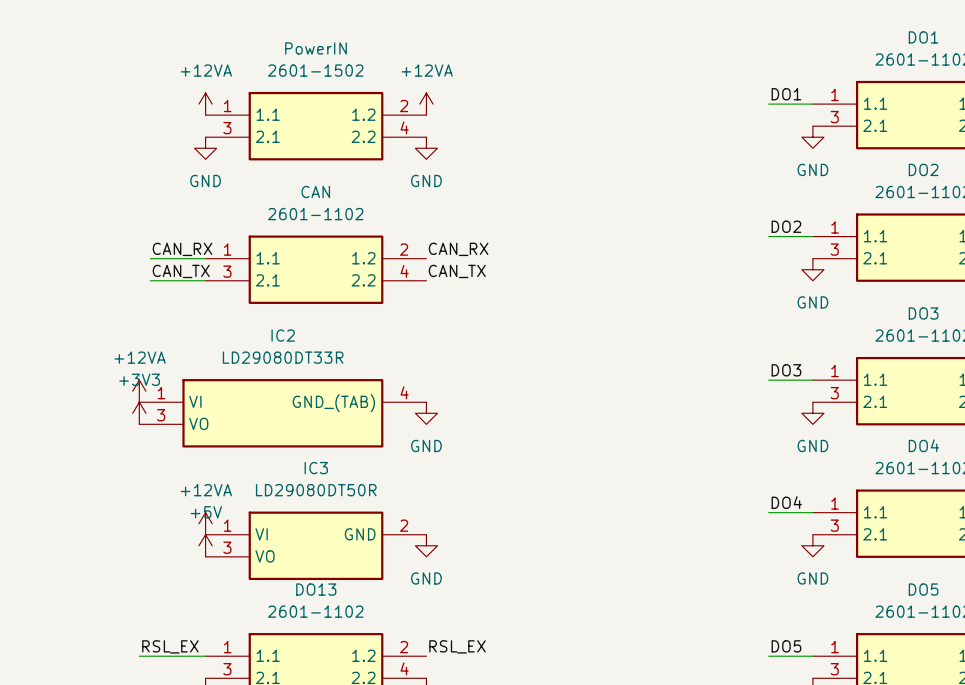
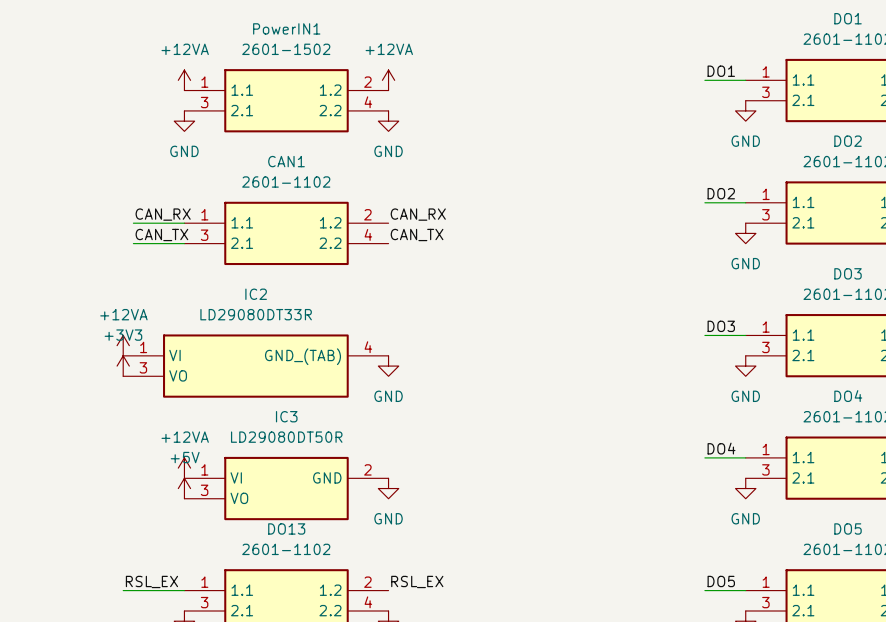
PowerIN name: PowerIN (316, 48) -> PowerIN1 (286, 28)
CAN name: CAN (315, 192) -> CAN1 (286, 161)

